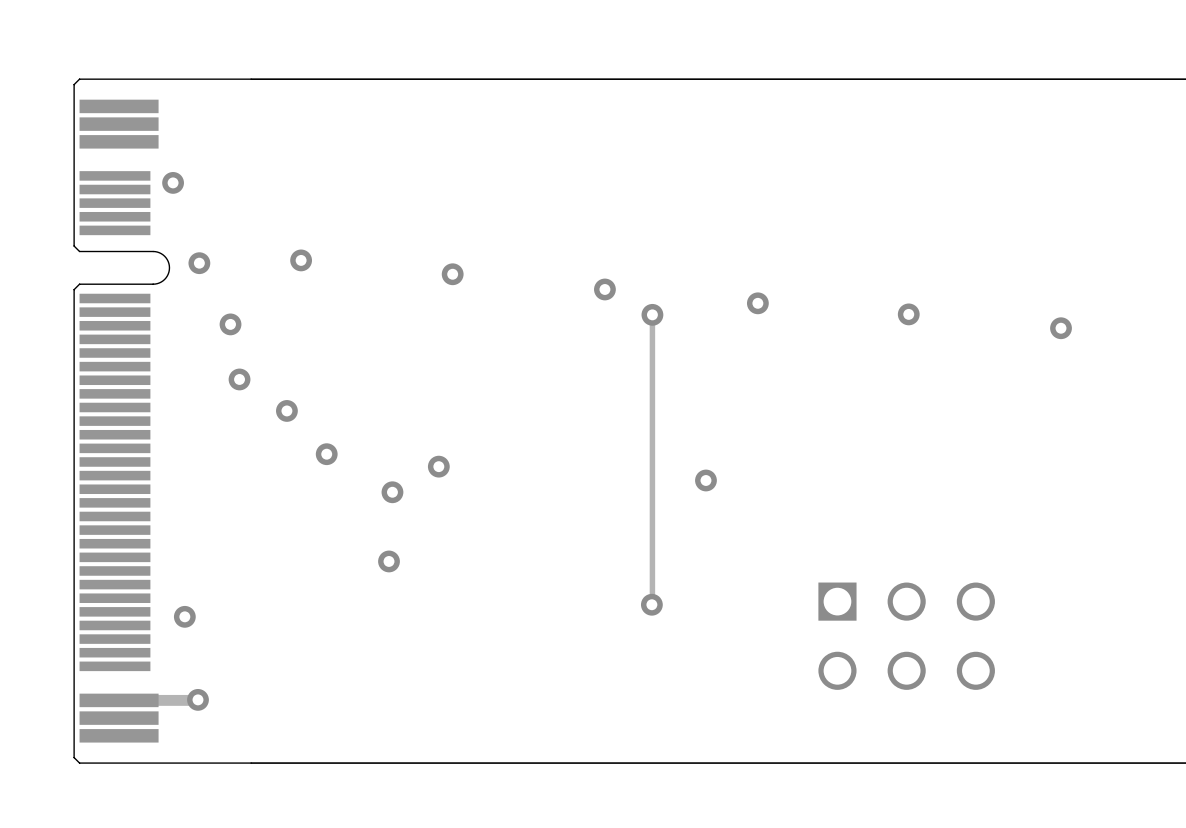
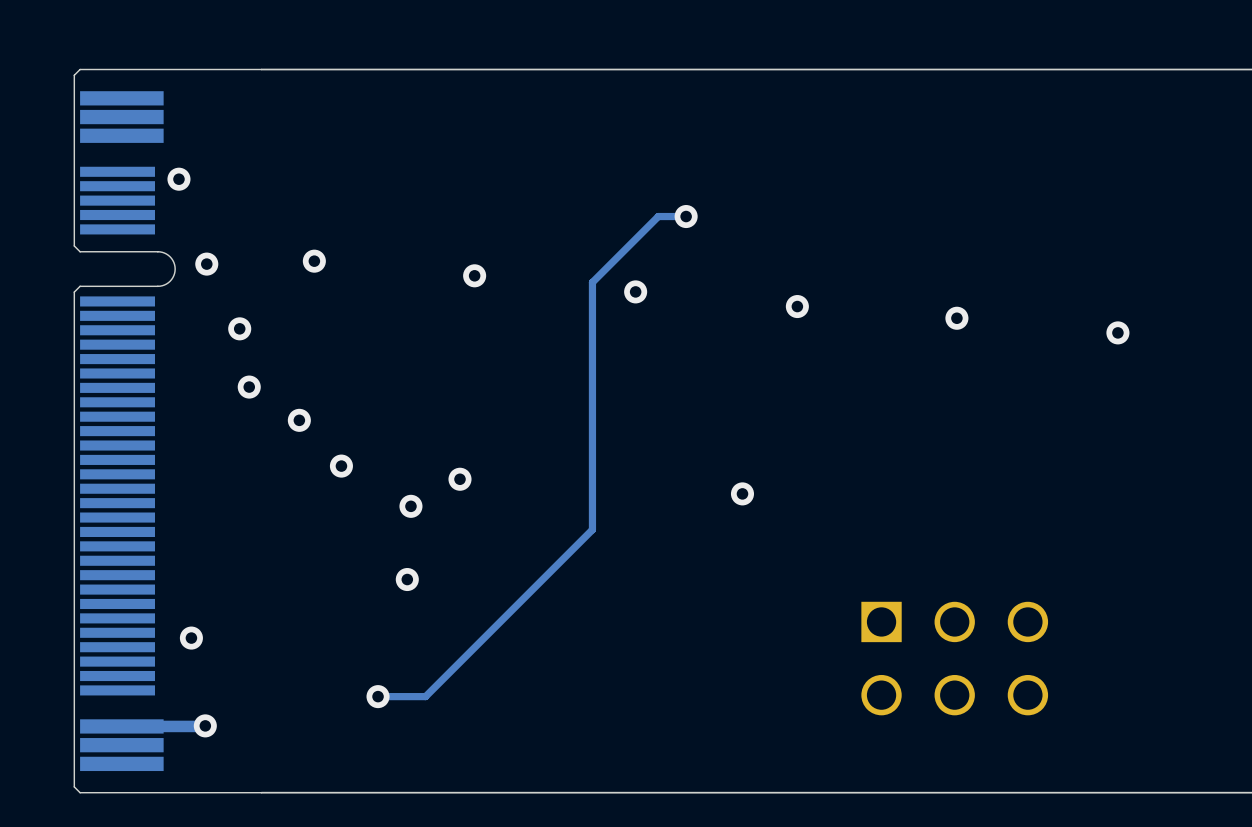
track: none -> (686, 216) (658, 216) (592, 282) (592, 529) (425, 696) (378, 696)
track: (652, 314) (651, 604) -> none
via position: (652, 314) -> (686, 216)
via: (651, 604) -> none
via: none -> (378, 696)

